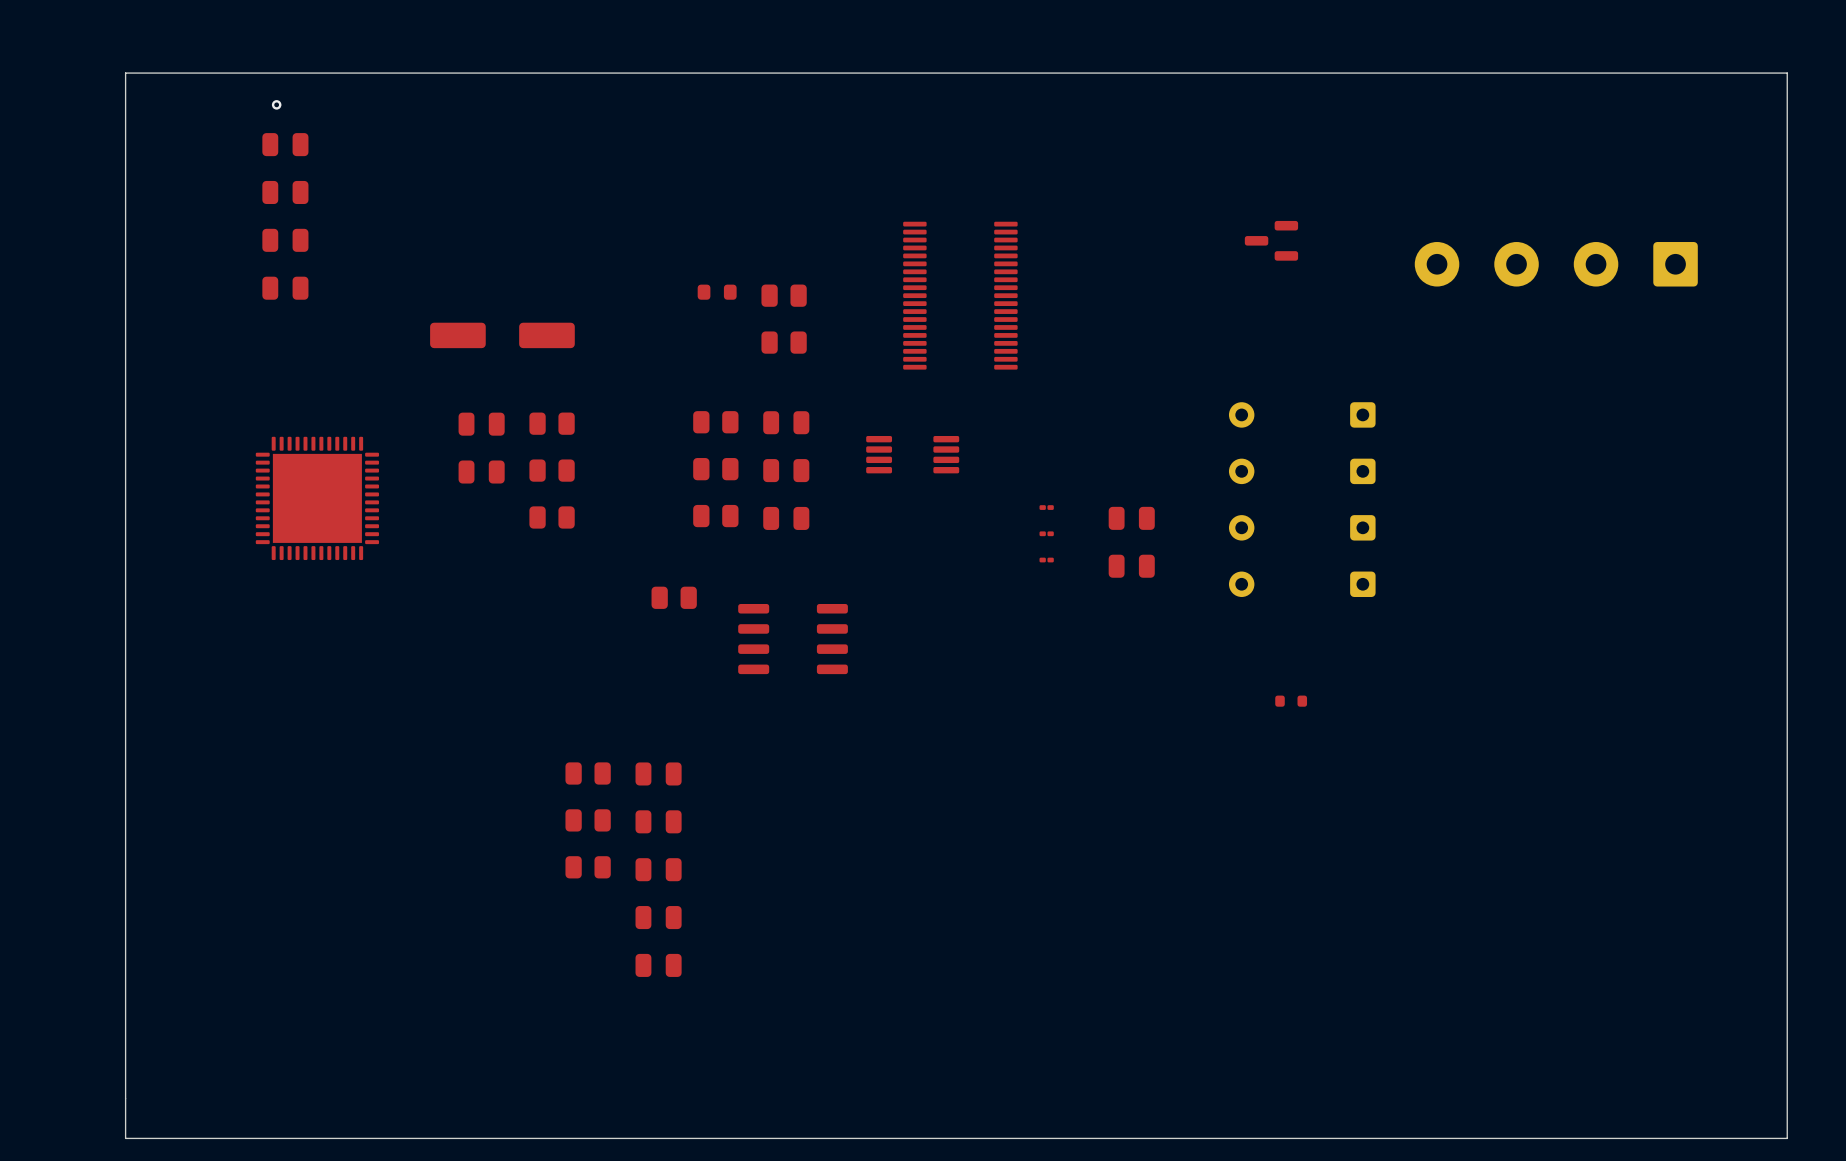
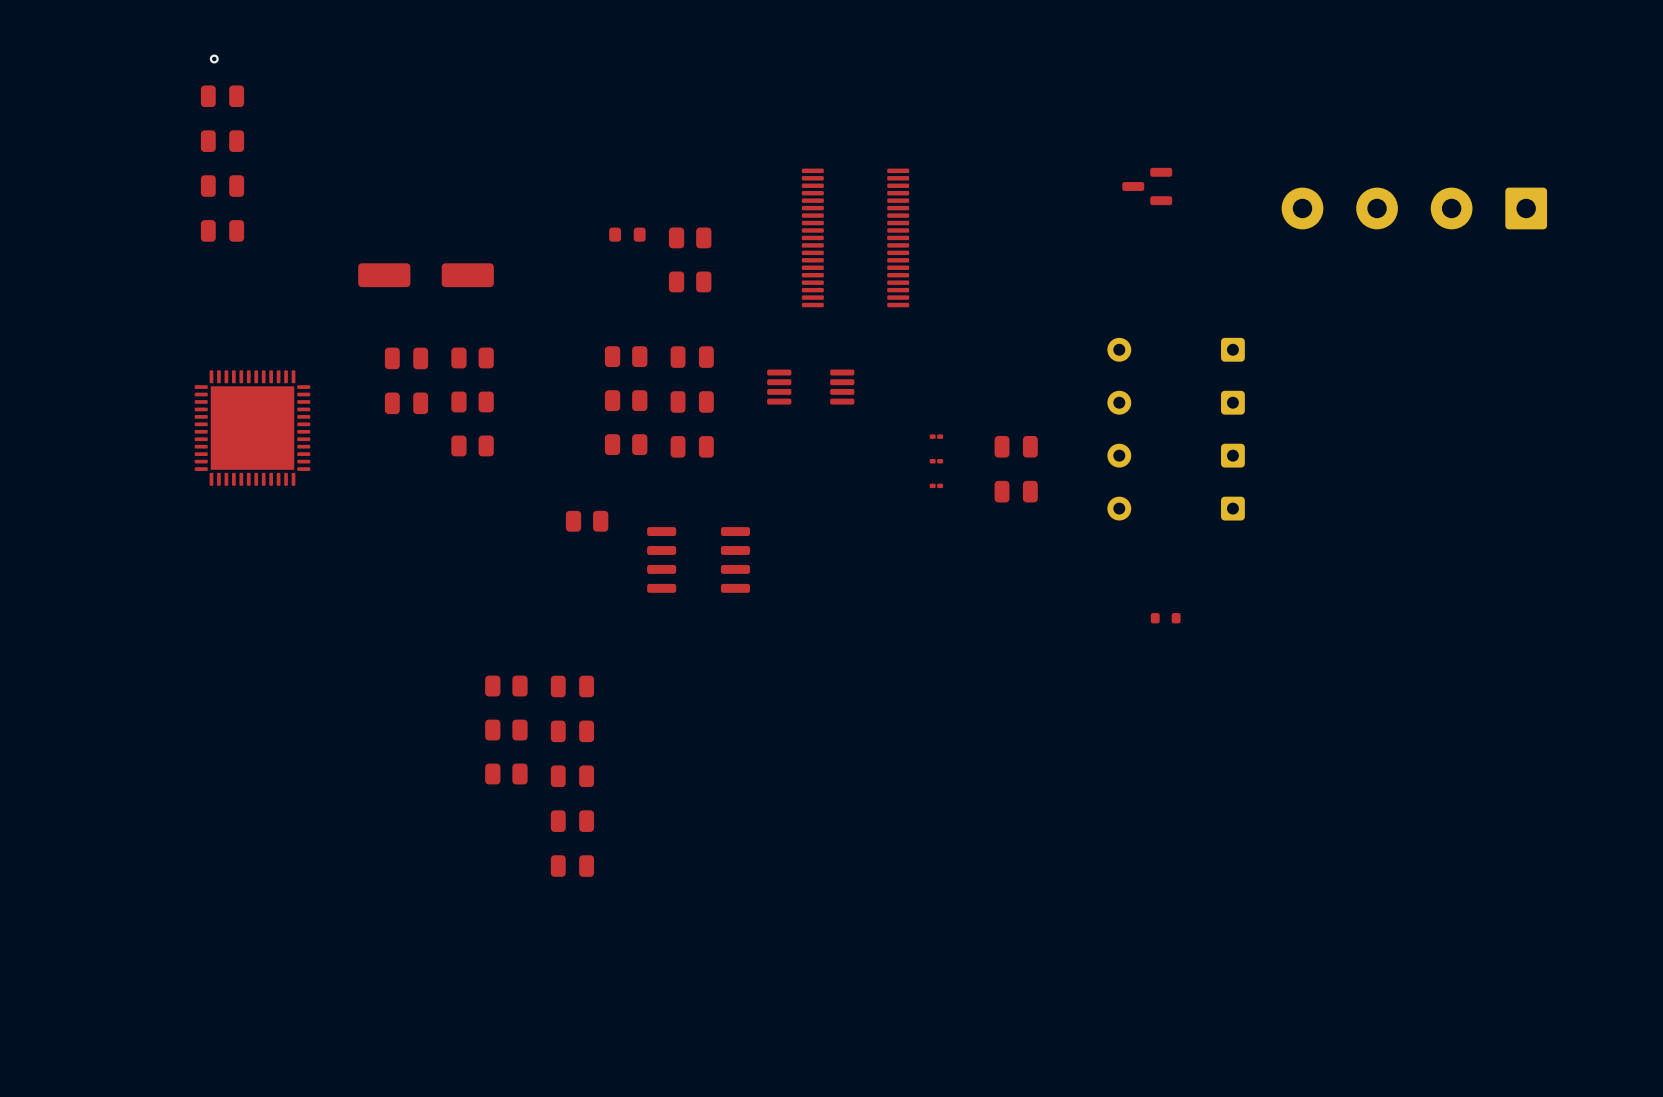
board edge: (1787, 73) (1787, 1138) (125, 1138) (125, 73) (1787, 73) -> none

